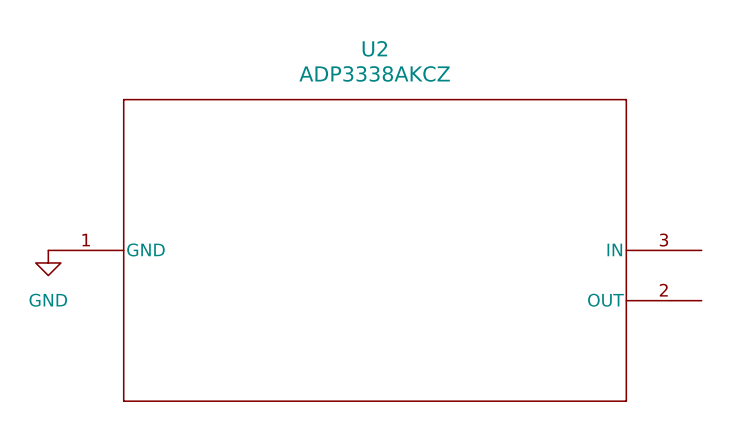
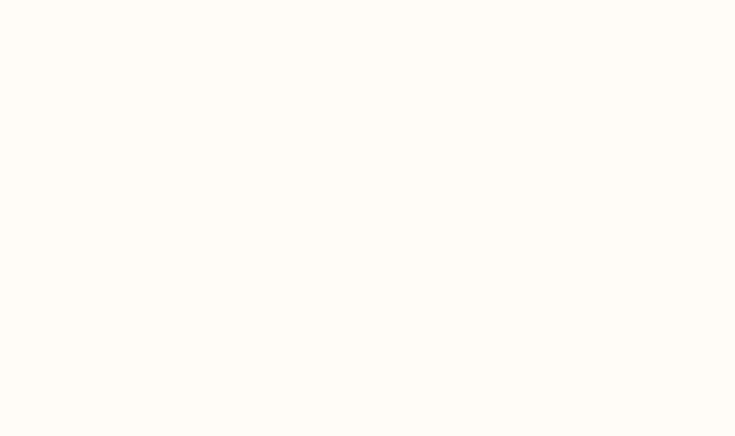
U2: ADP3338AKCZ (375, 250) -> none
power symbol: GND (48, 262) -> none

